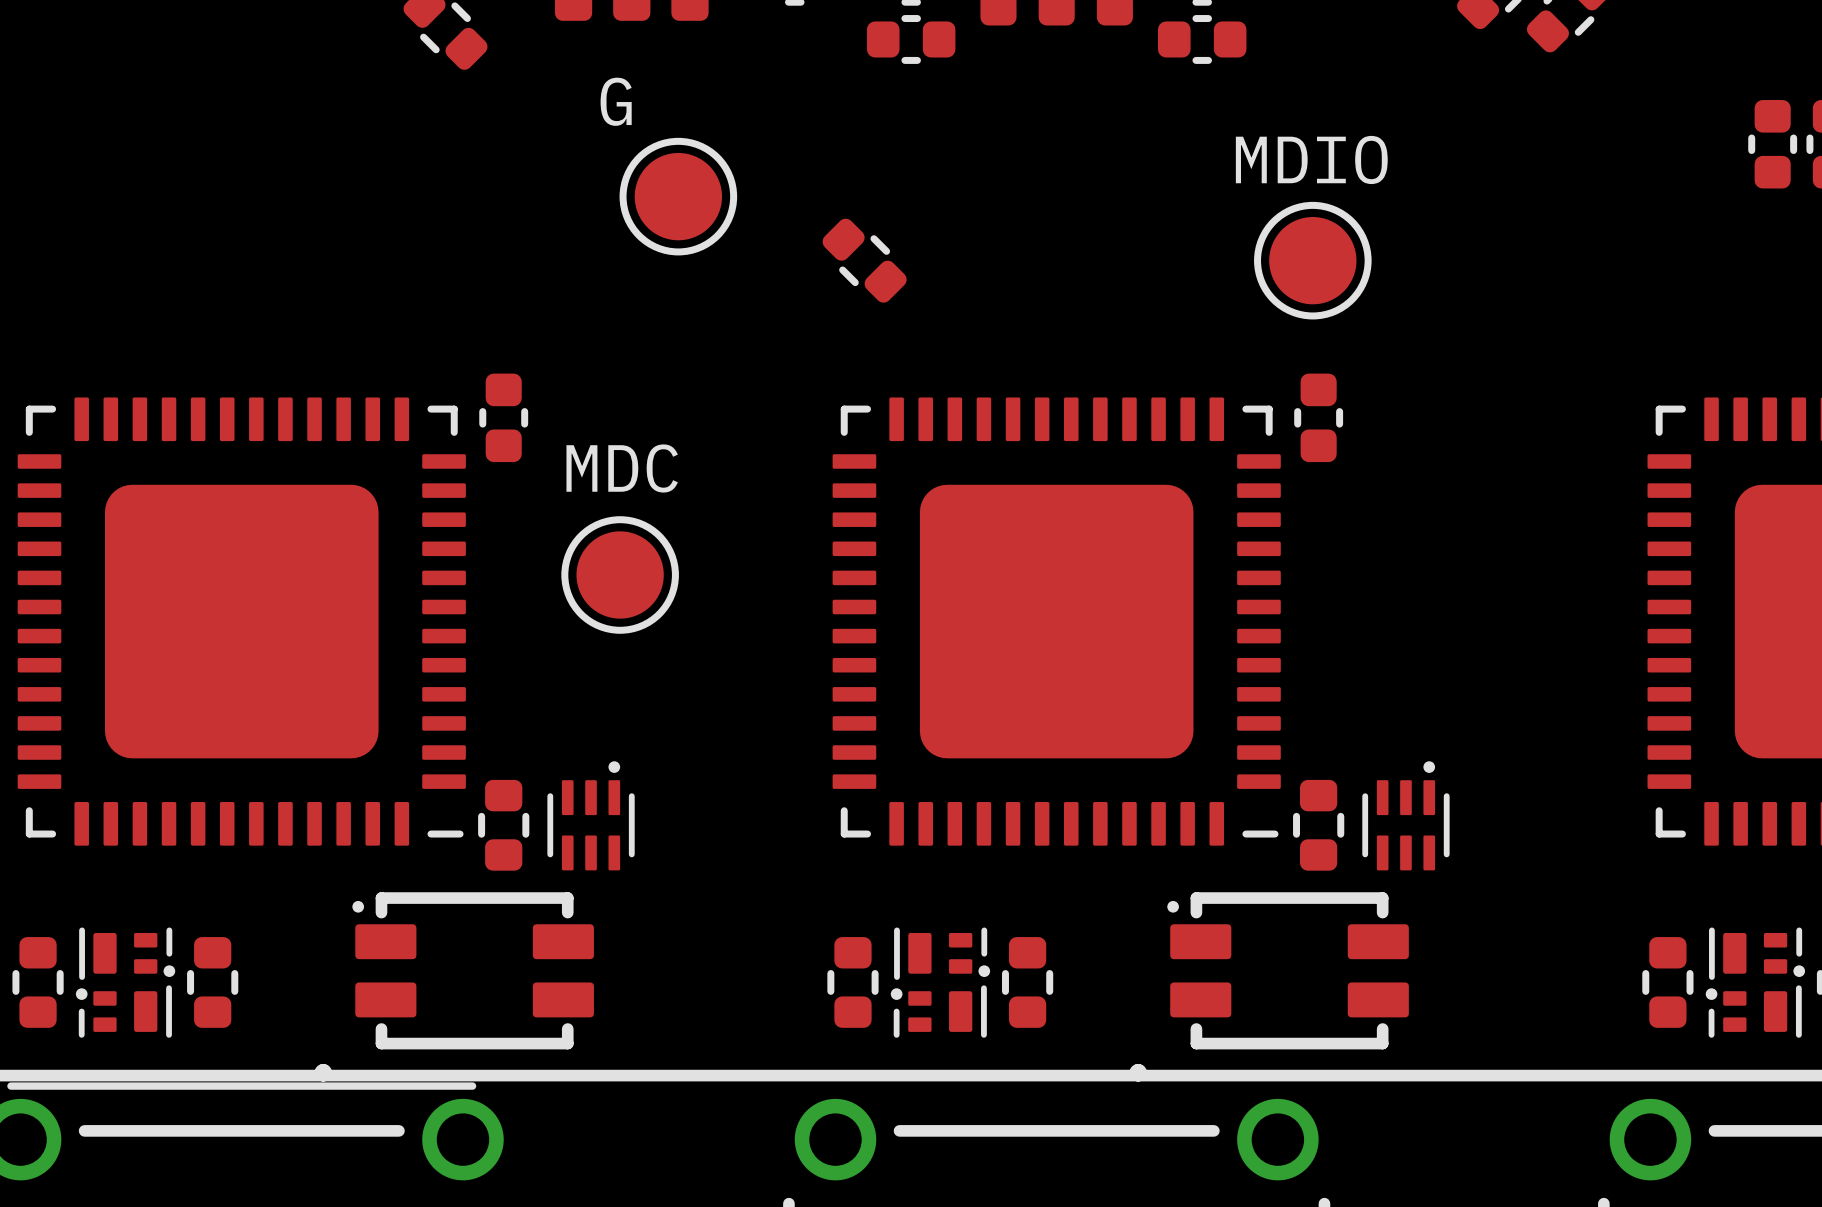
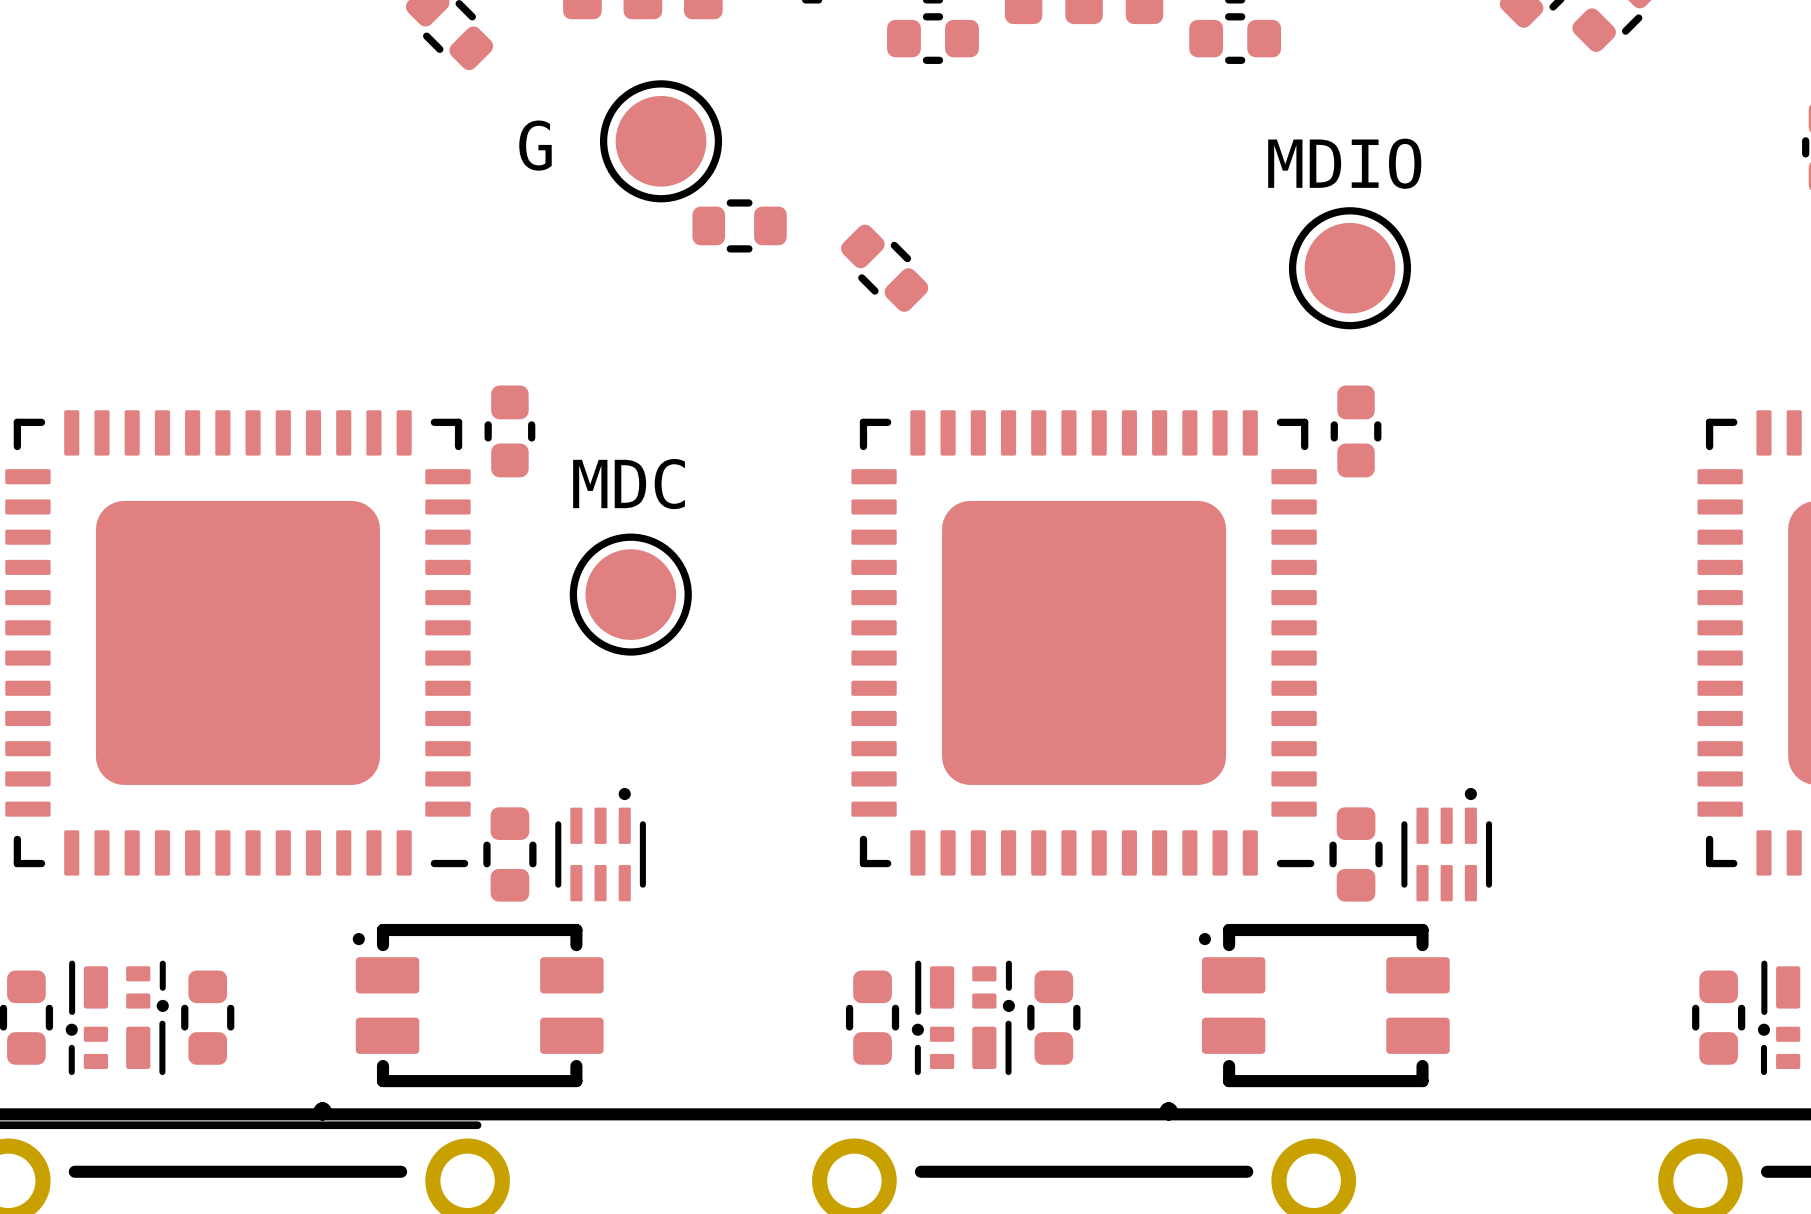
text position: G (616, 101) -> G (535, 145)
part position: (678, 196) -> (661, 141)
part: none -> (739, 225)

